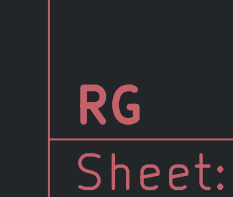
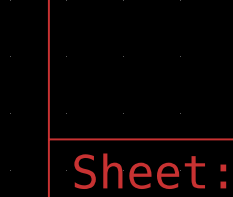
title block: RG (109, 104) -> none

